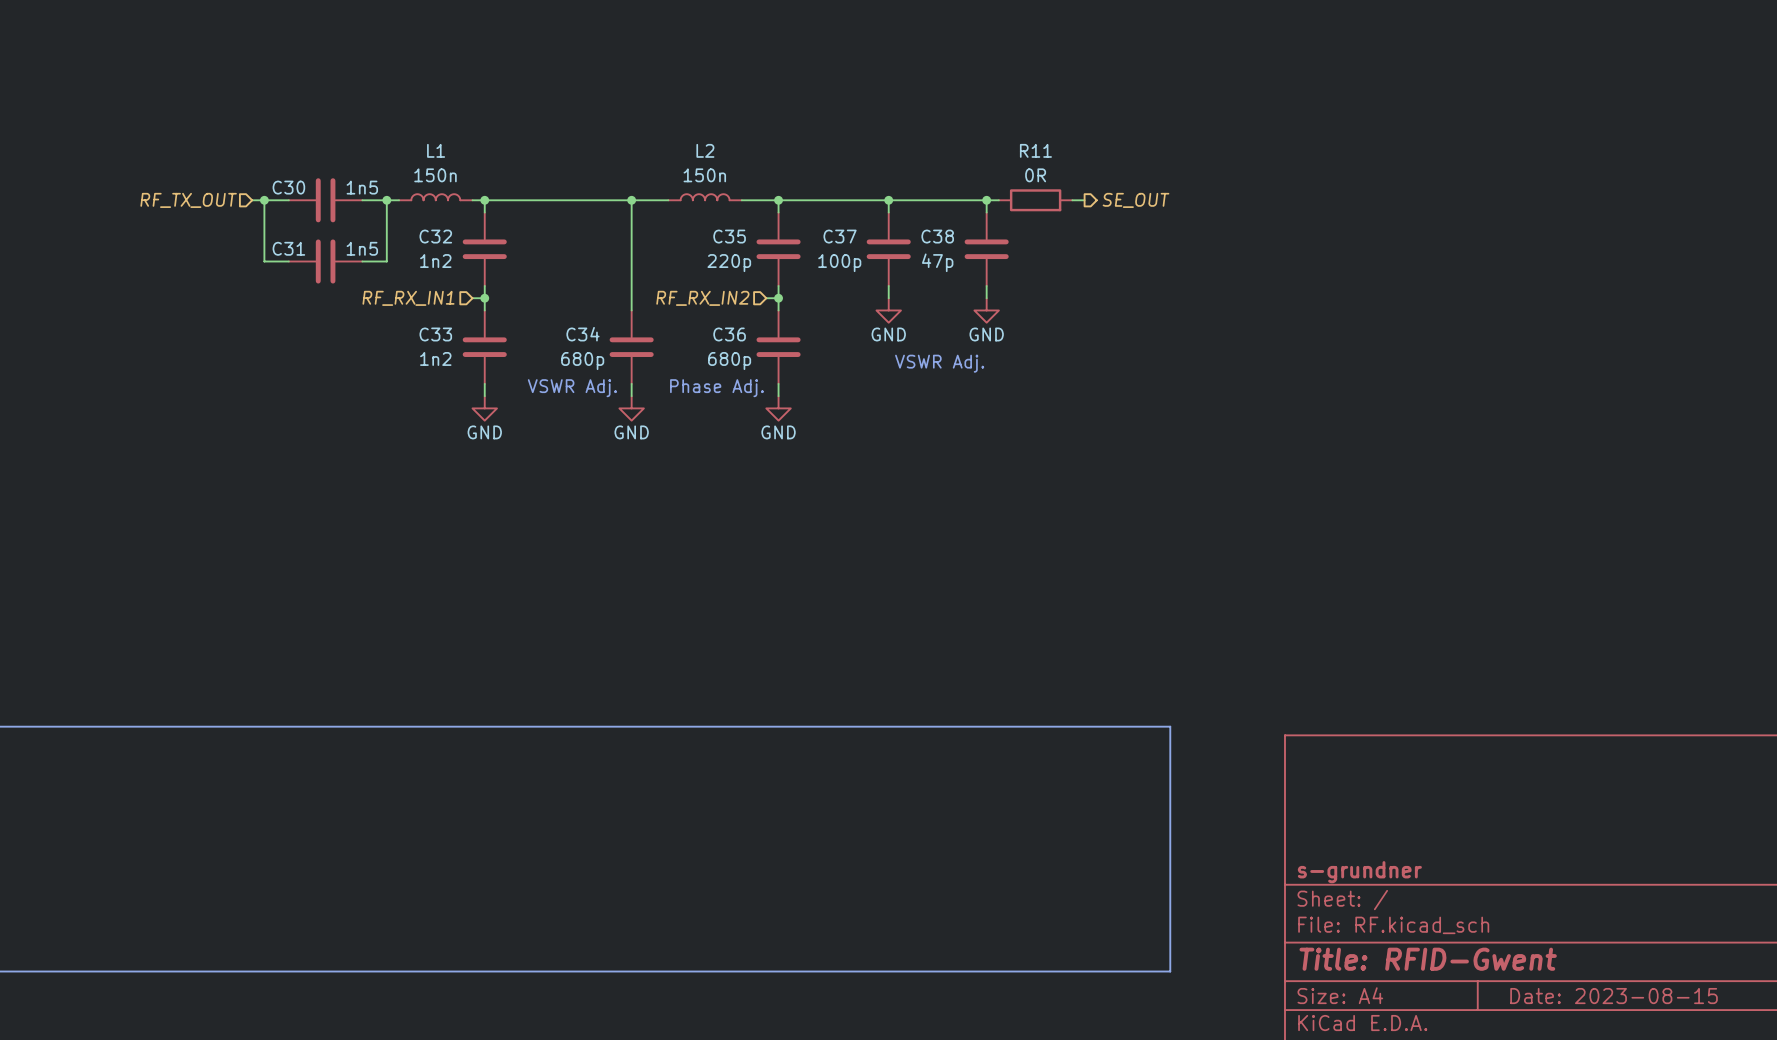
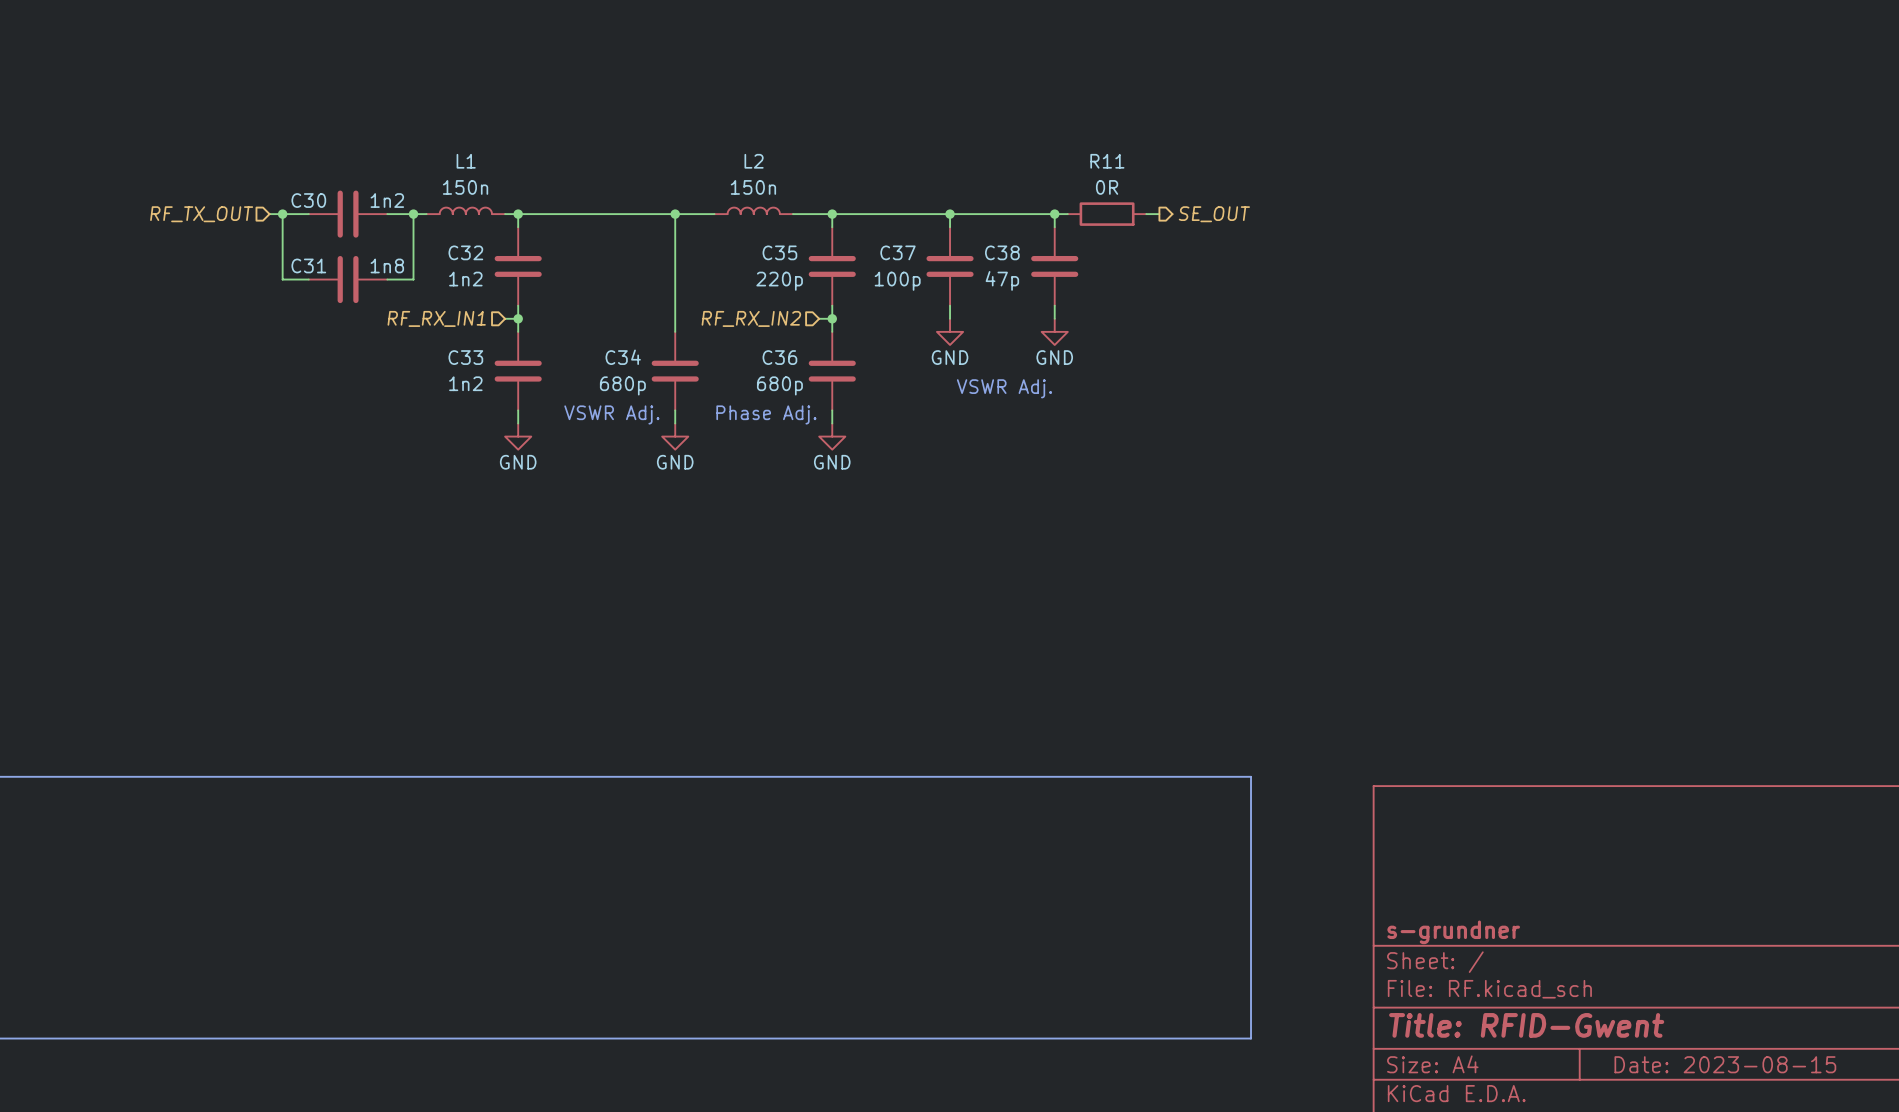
C30 value: 1n5 (362, 187) -> 1n2 (387, 200)
C31 value: 1n5 (362, 248) -> 1n8 (387, 265)

